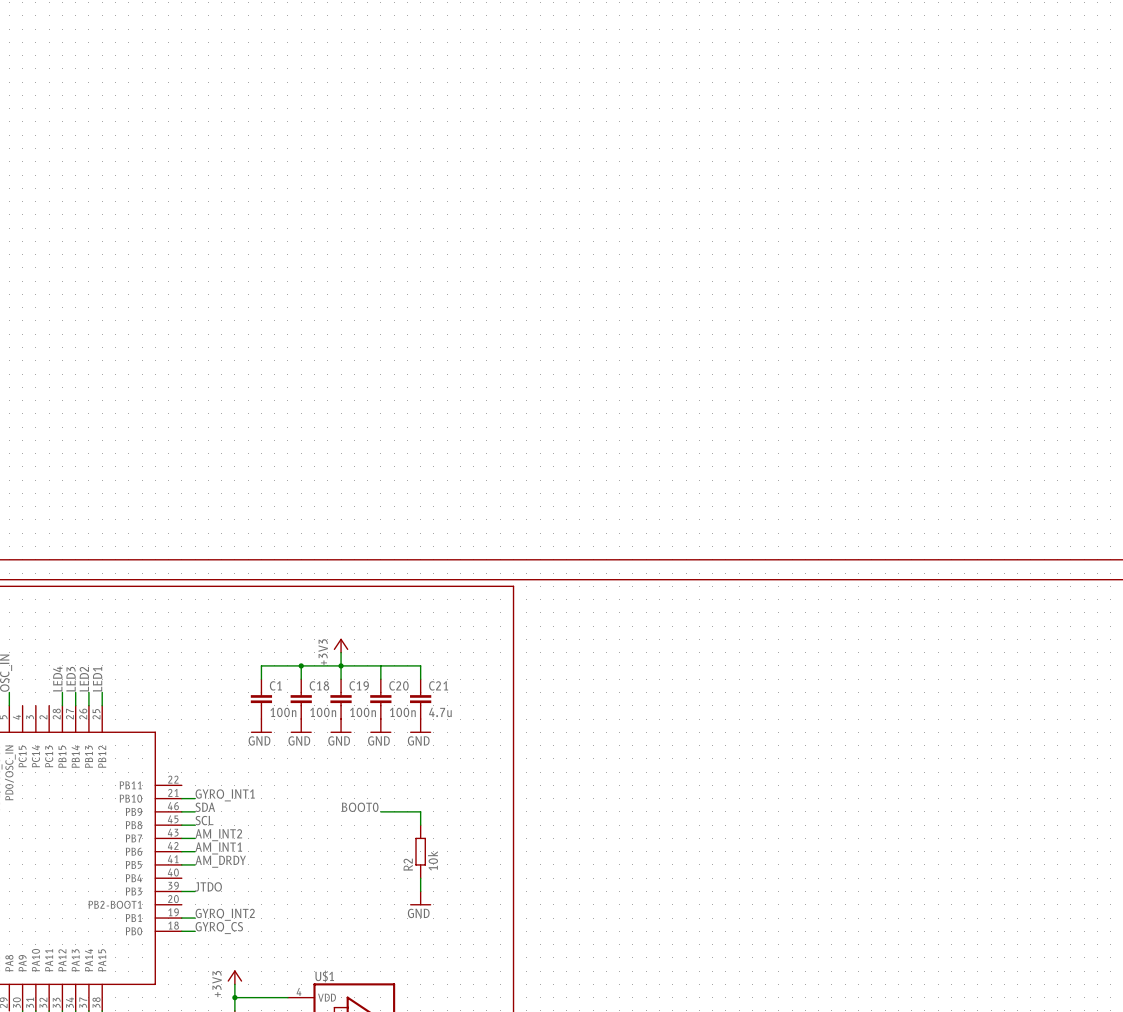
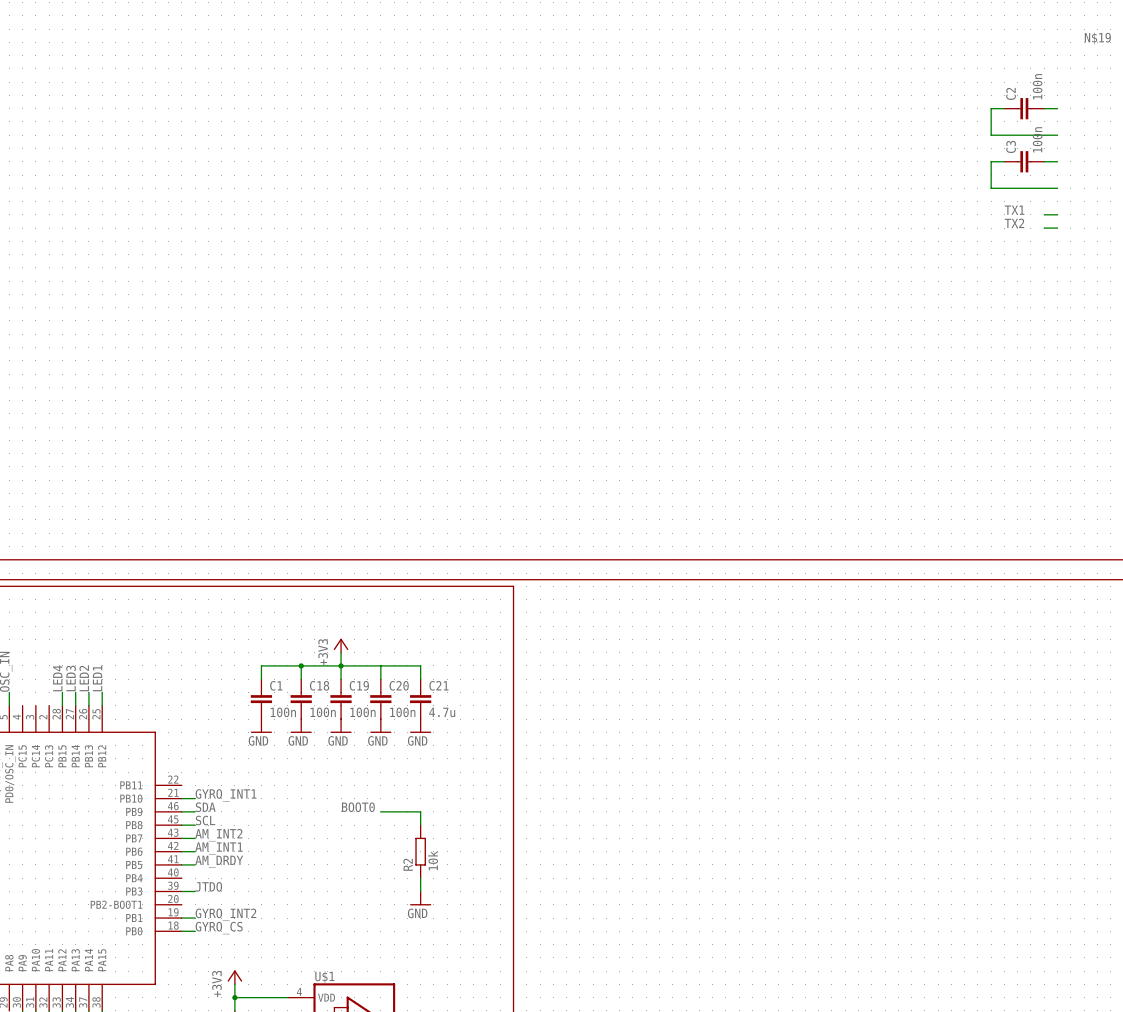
label: none -> N$19 (1097, 38)
wire: none -> (1004, 108) (991, 108) (991, 135) (1057, 135)
C2: none -> 100n (1024, 108)
wire: none -> (1044, 108) (1057, 108)
wire: none -> (1004, 161) (991, 161) (991, 188) (1057, 188)
C3: none -> 100n (1024, 161)
wire: none -> (1044, 161) (1057, 161)
label: none -> TX1 (1014, 210)
wire: none -> (1044, 214) (1057, 214)
label: none -> TX2 (1014, 223)
wire: none -> (1044, 228) (1057, 228)

